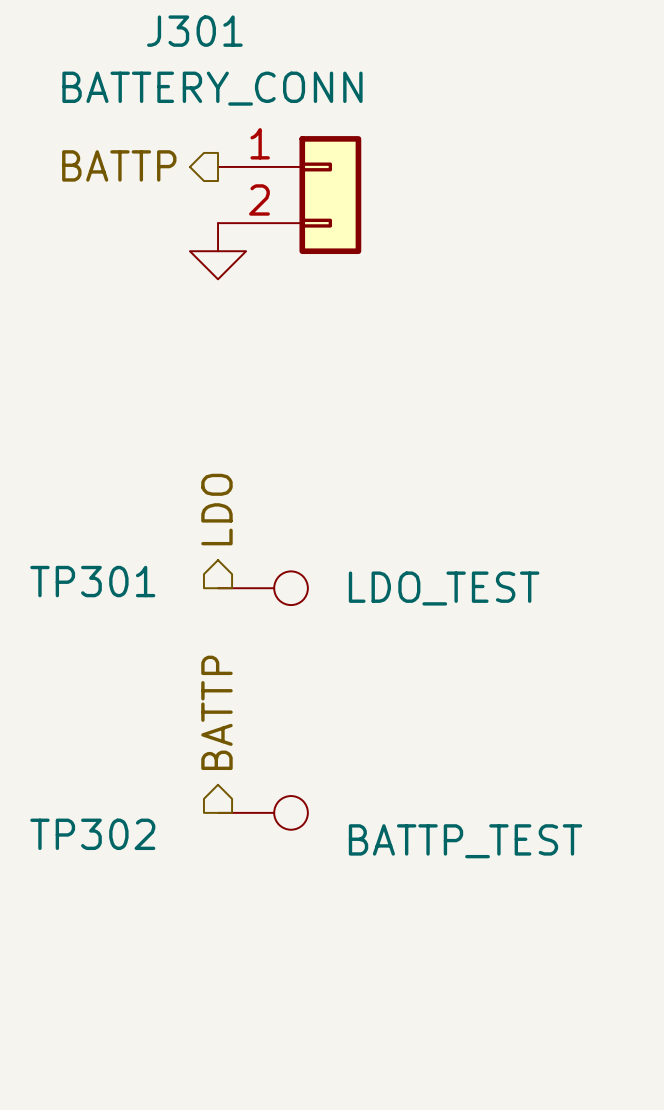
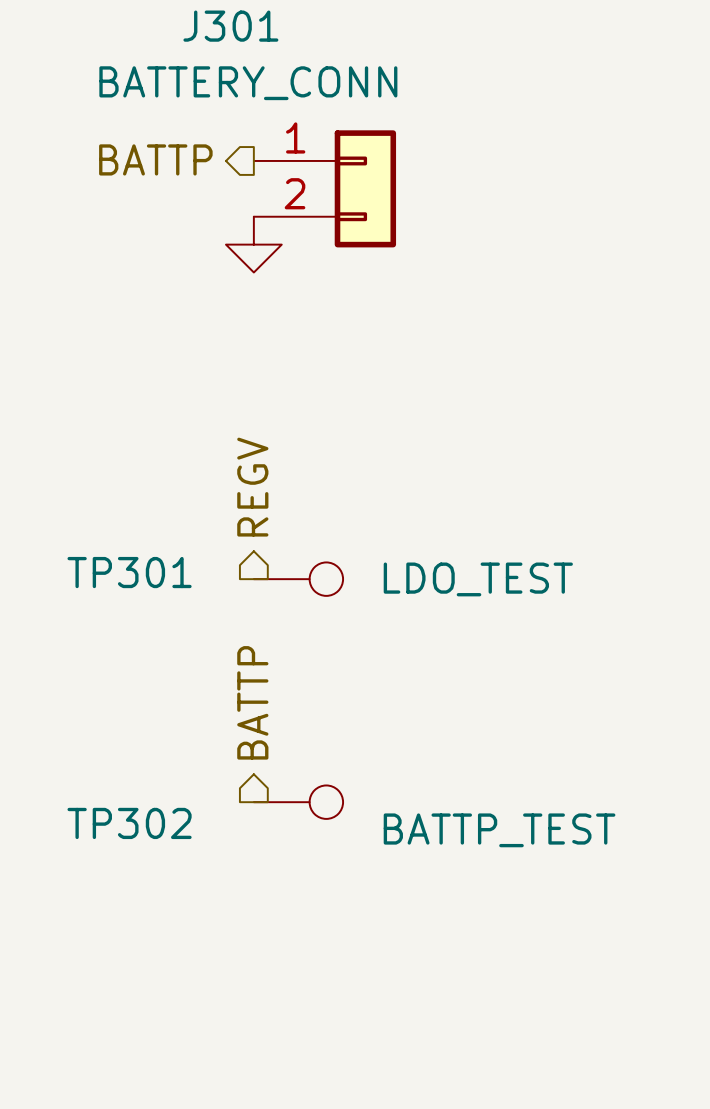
hierarchical label: LDO (216, 509) -> REGV (252, 487)

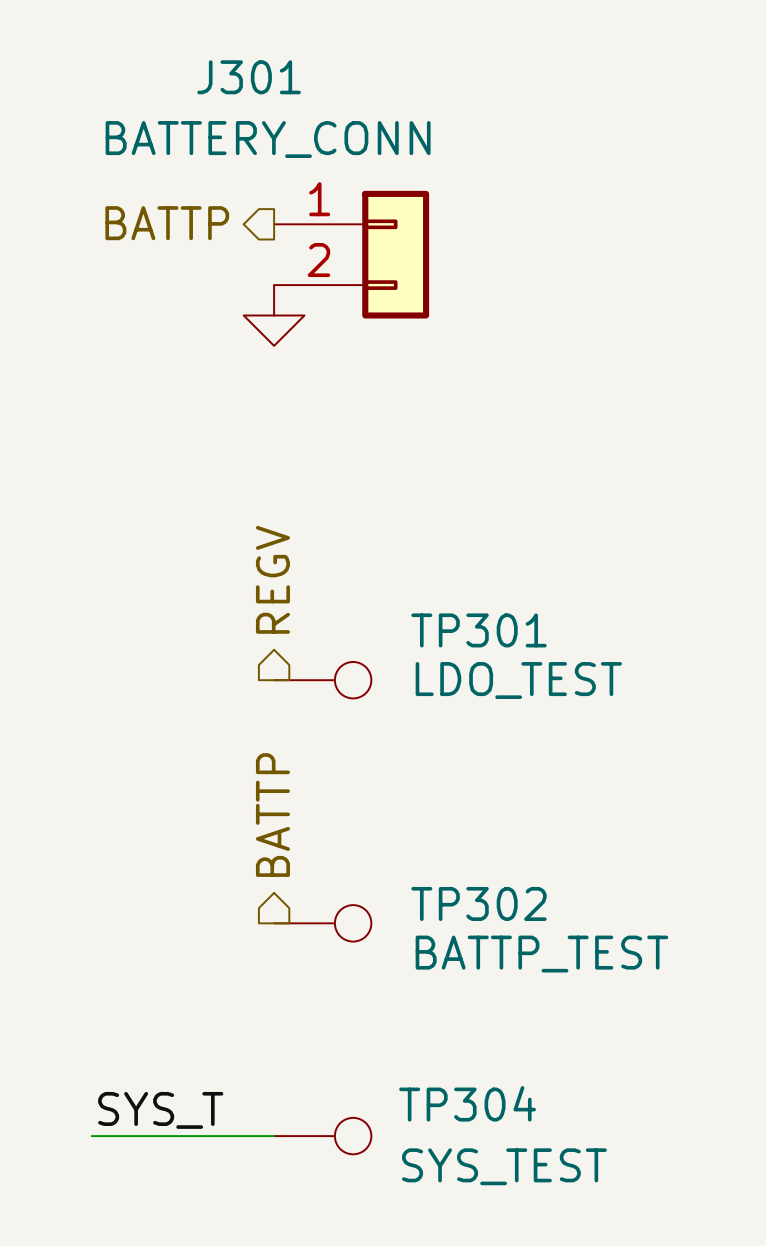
TP301 name position: TP301 (129, 572) -> TP301 (478, 630)
TP302 name position: TP302 (129, 823) -> TP302 (478, 903)
label: none -> SYS_T (160, 1110)
wire: none -> (91, 1136) (274, 1136)
TP304: none -> SYS_TEST (322, 1136)

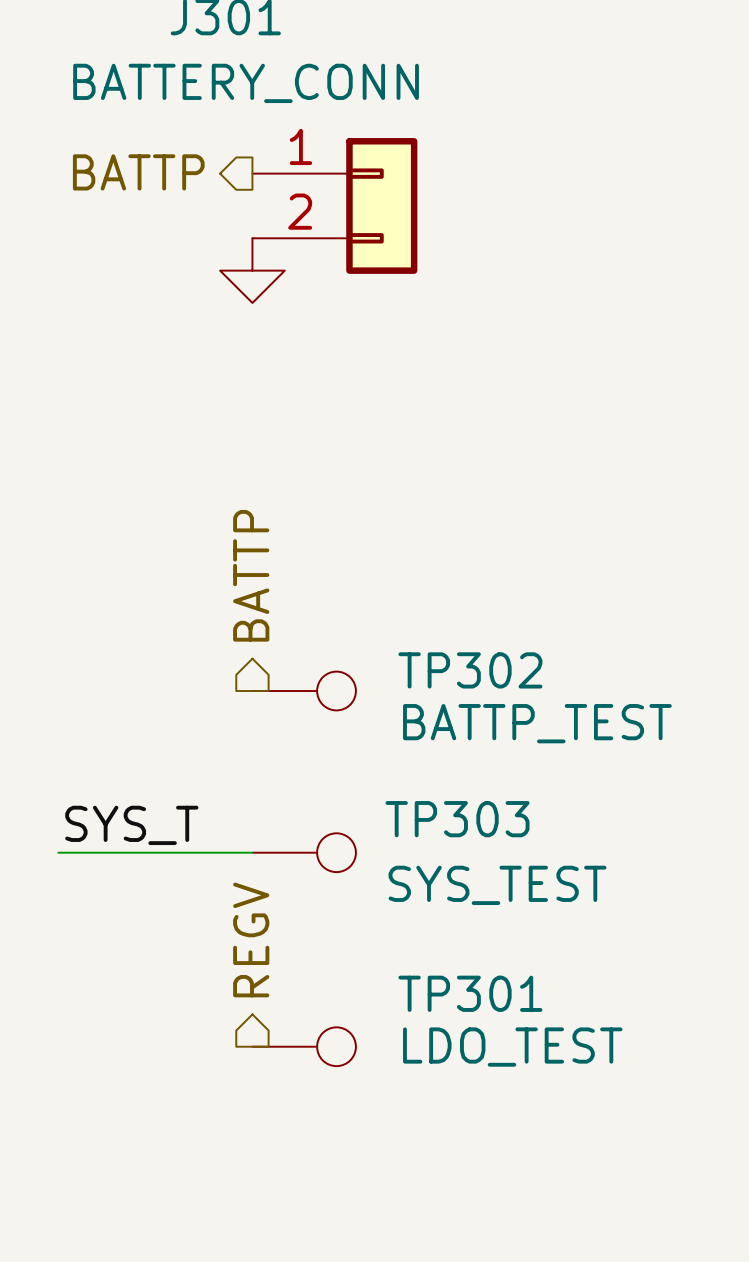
hierarchical label position: REGV (272, 579) -> REGV (251, 939)
TP301 position: (322, 680) -> (304, 1046)
hierarchical label position: BATTP (272, 815) -> BATTP (251, 575)
TP303: none -> SYS_TEST (304, 852)
TP302 position: (322, 923) -> (304, 691)
label position: SYS_T (160, 1110) -> SYS_T (131, 825)
wire: (91, 1136) (274, 1136) -> (58, 852) (252, 852)
TP304: SYS_TEST (322, 1136) -> none

